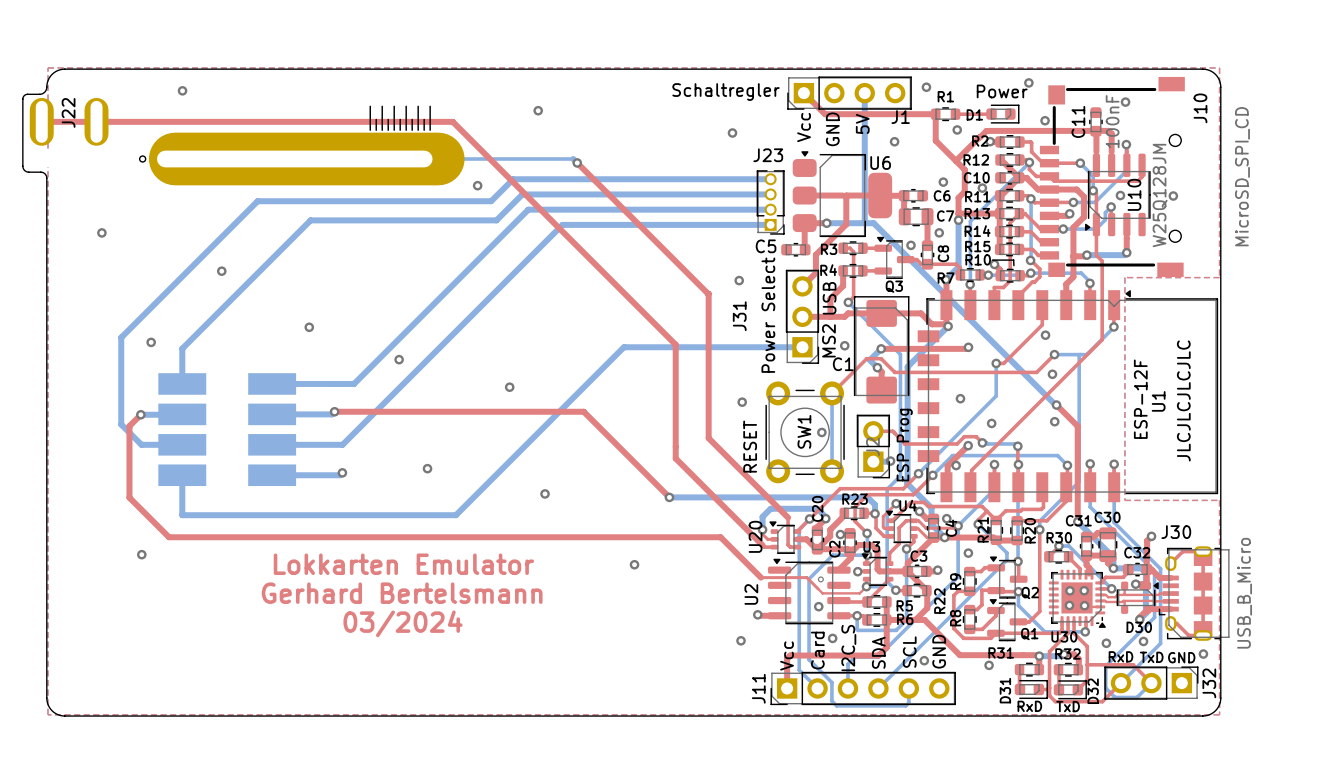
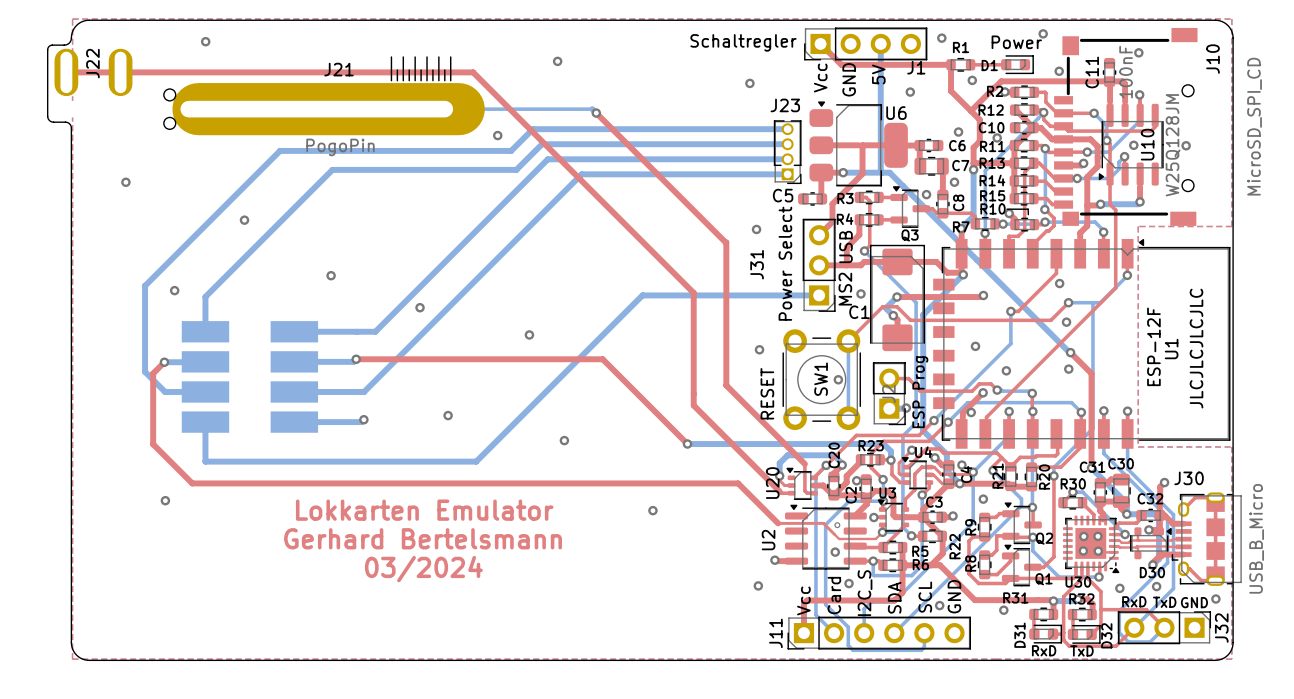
J21: none -> PogoPin (269, 95)
part: (248, 145) -> none

